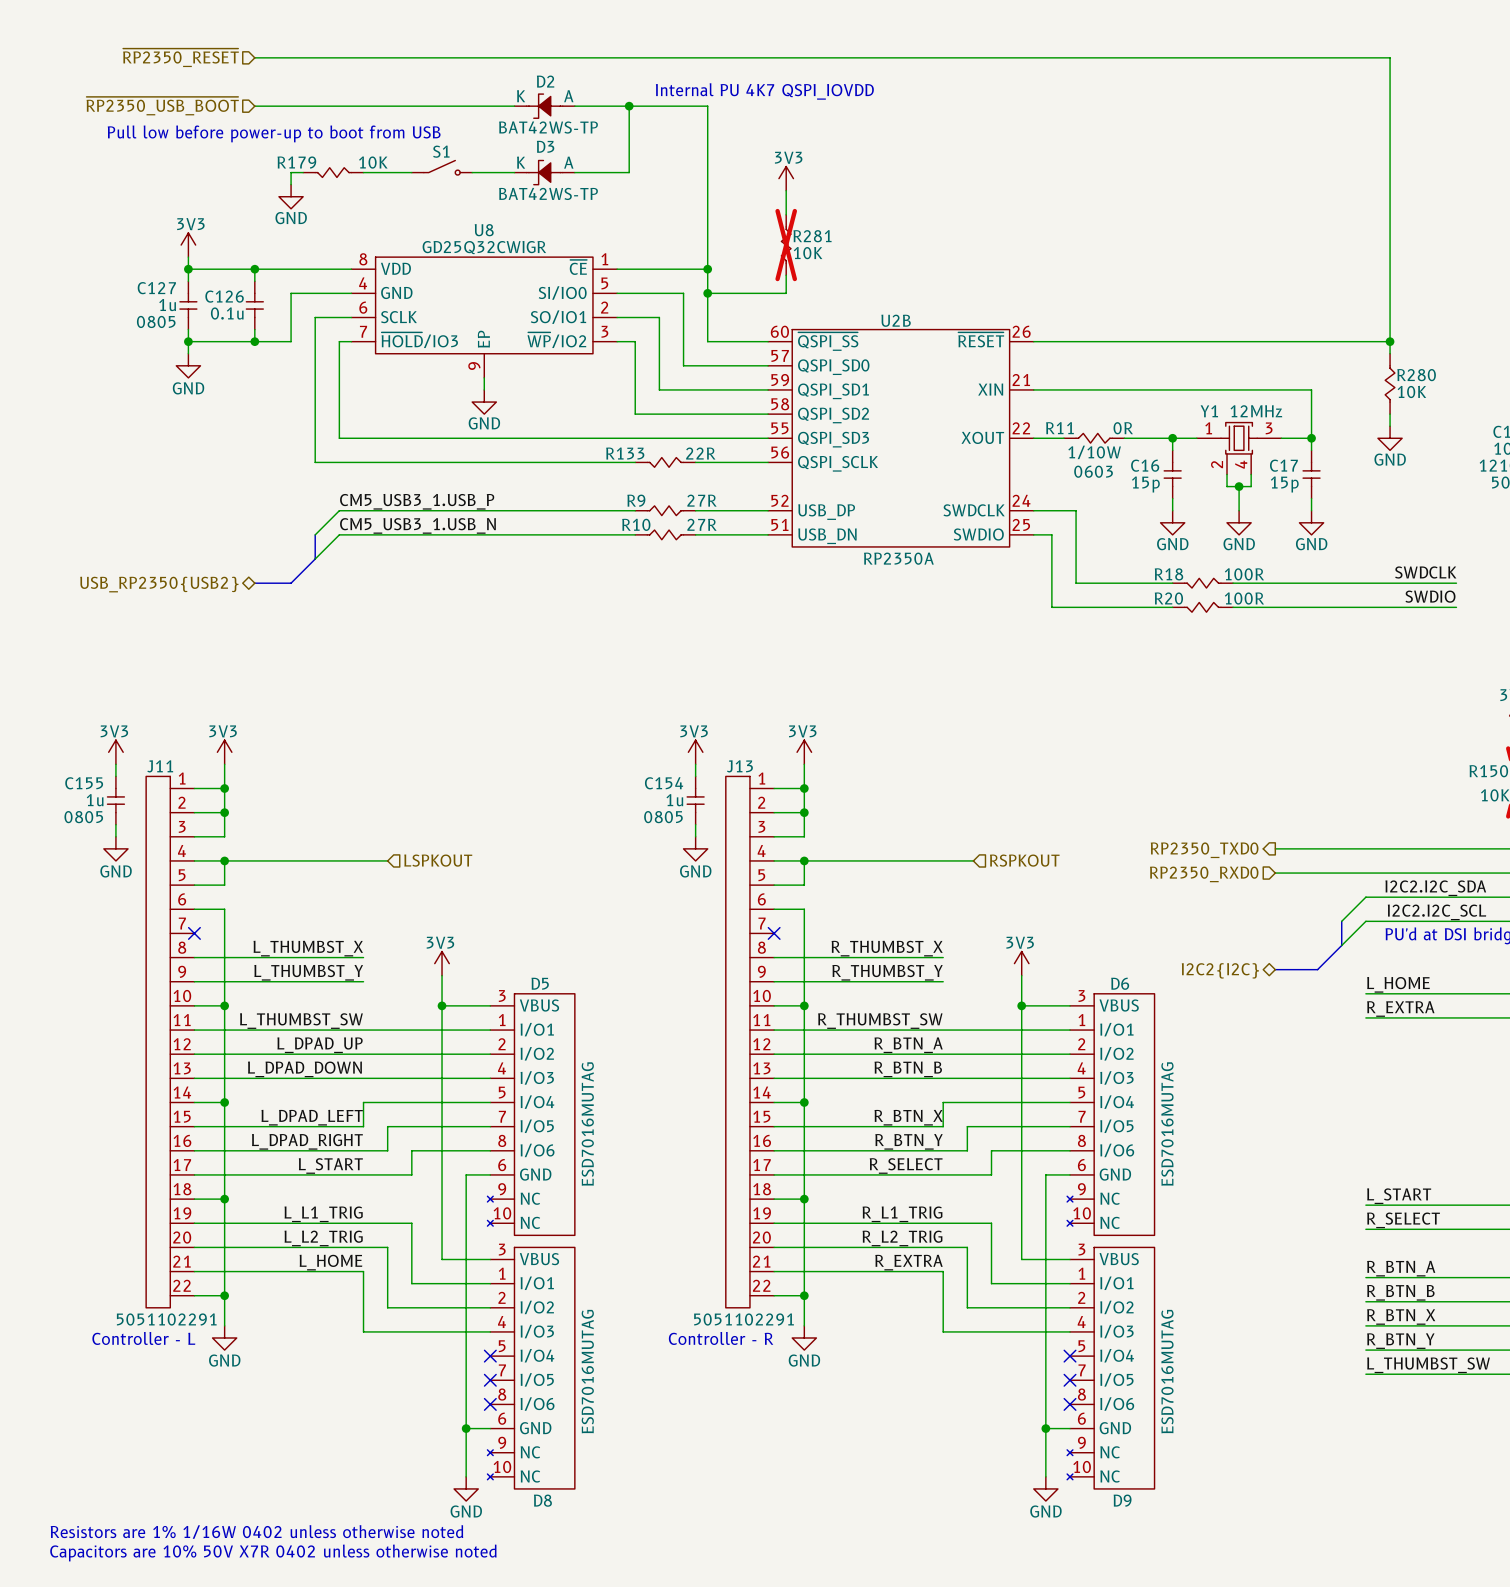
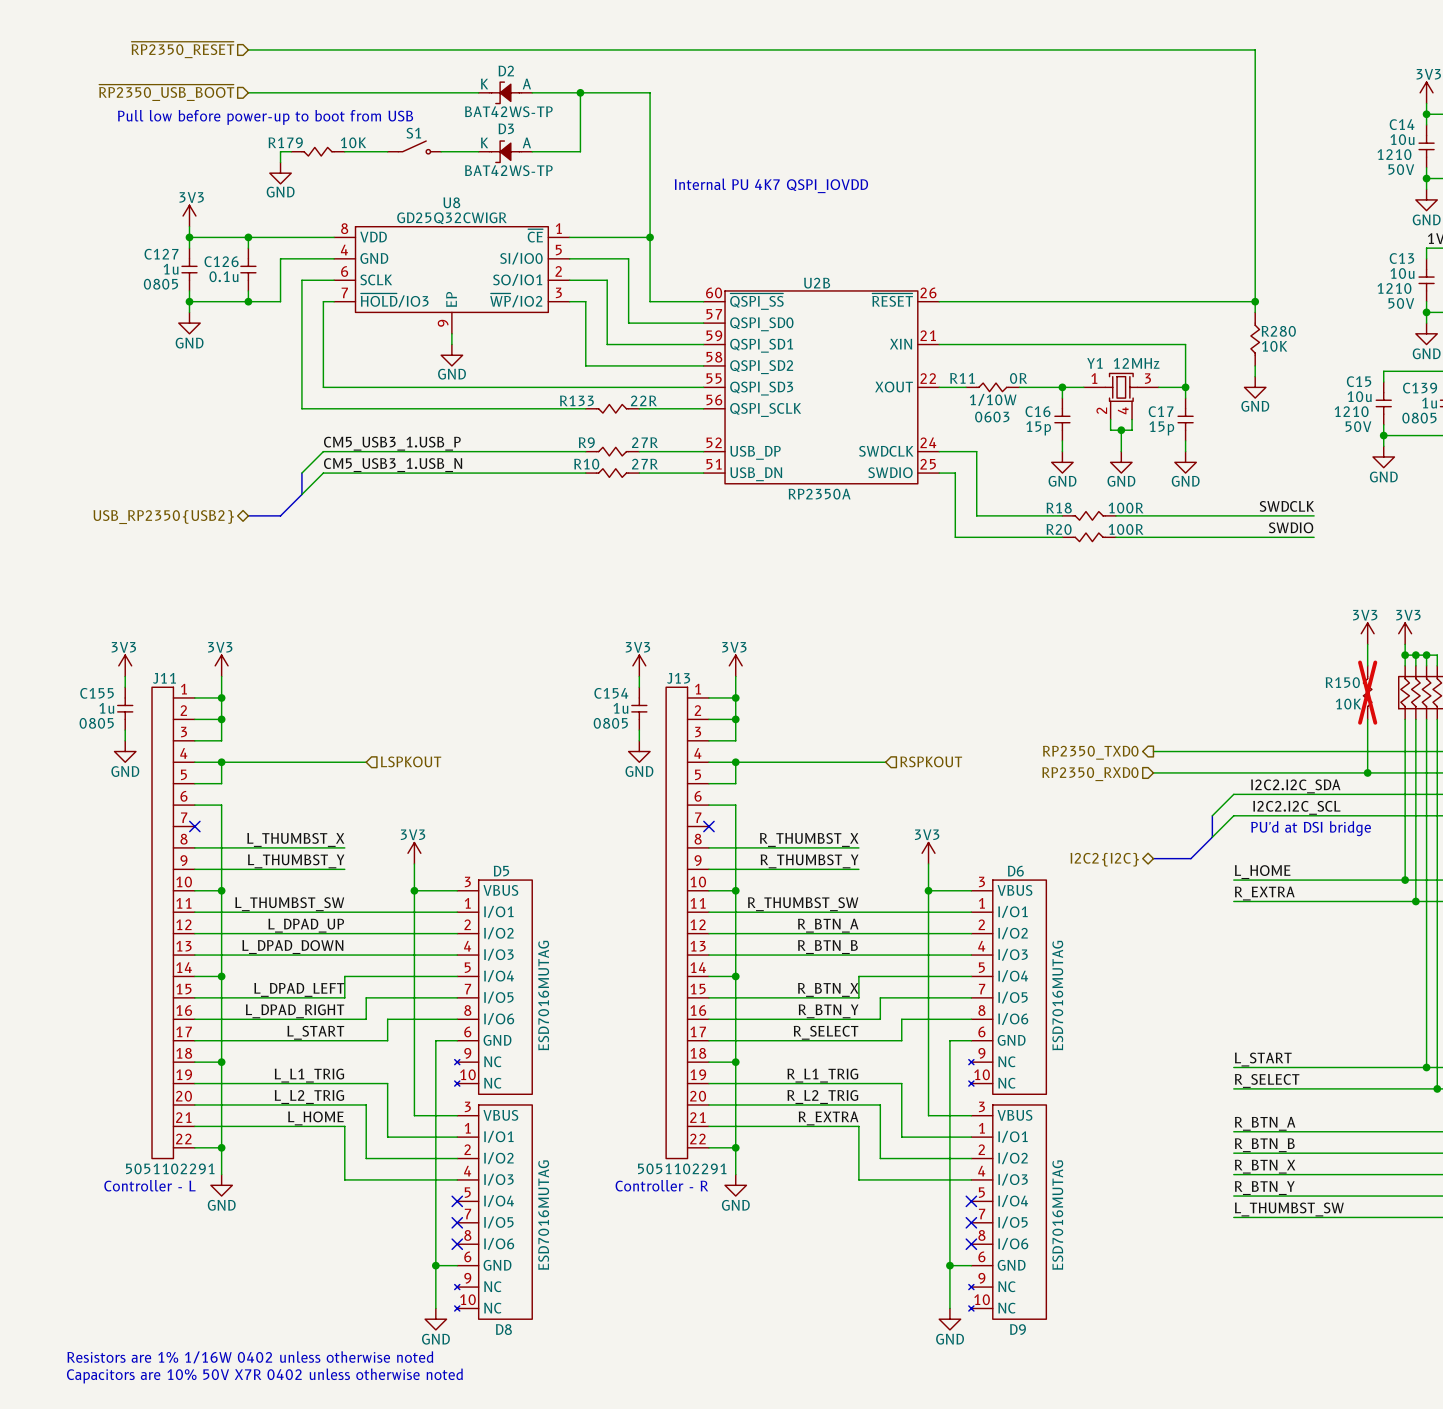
text position: Internal PU 4K7 QSPI_IOVDD (764, 91) -> Internal PU 4K7 QSPI_IOVDD (771, 185)
power symbol: 3V3 (786, 178) -> none
wire: (786, 190) (786, 214) -> none
R281: 10K (786, 245) -> none
wire: (786, 275) (786, 293) (707, 293) -> none
junction: (707, 293) -> none

